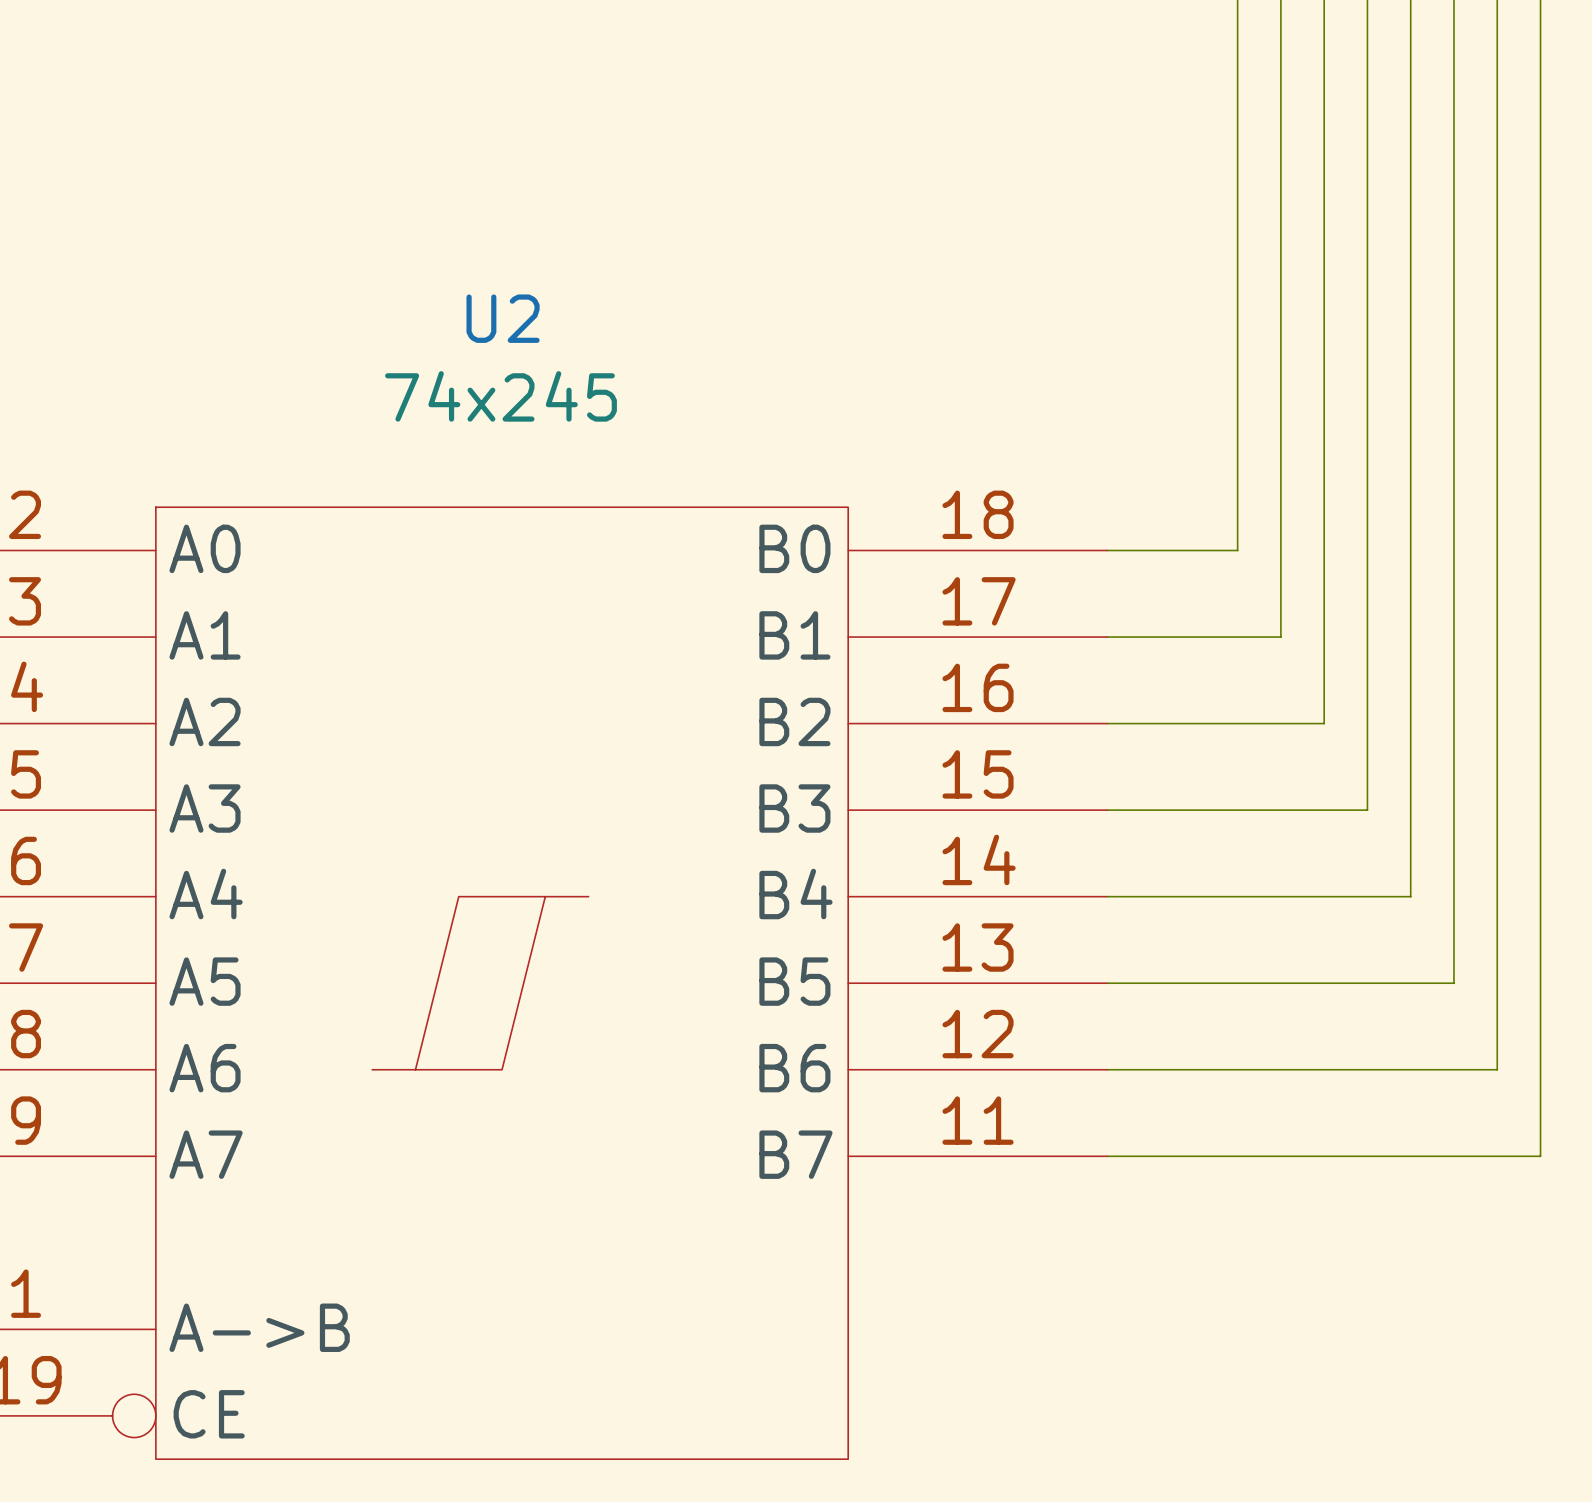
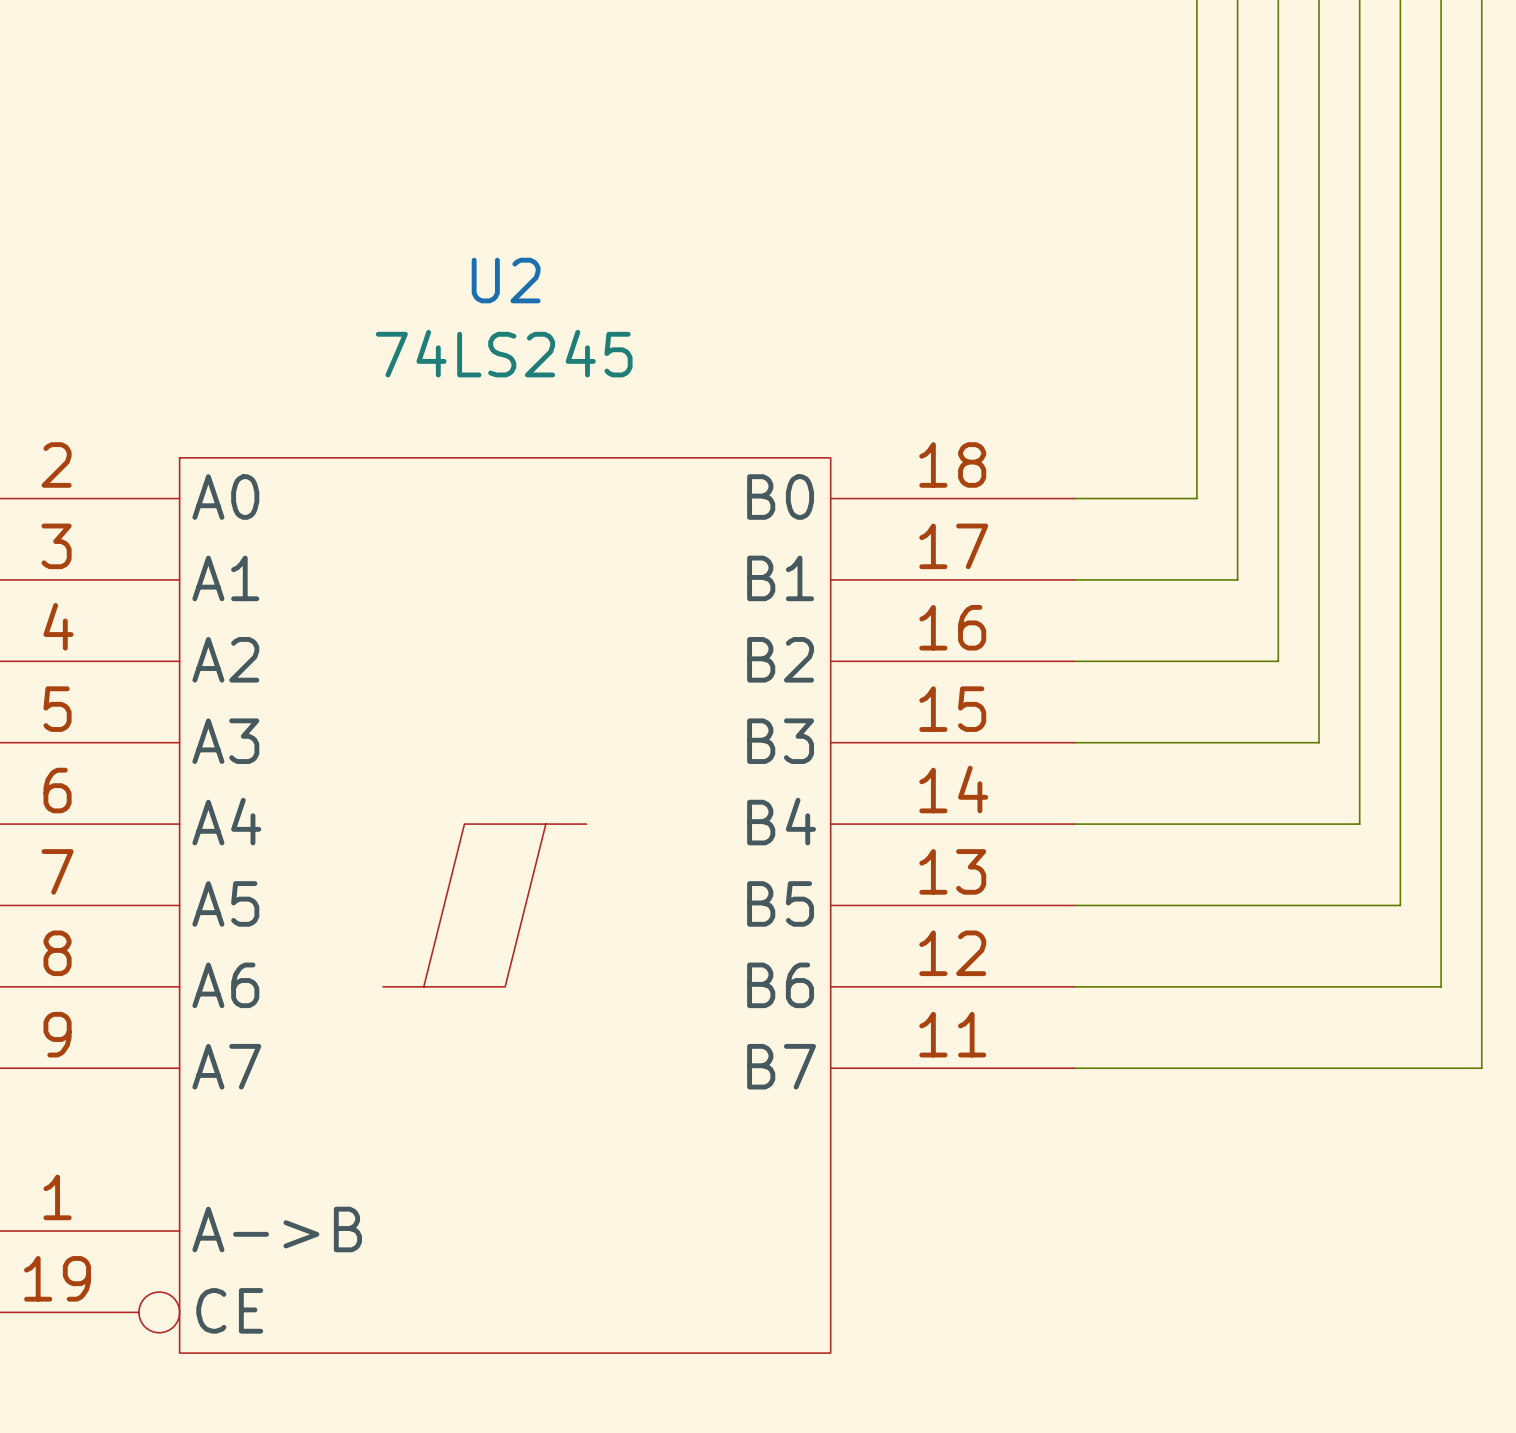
U2 value: 74x245 (501, 396) -> 74LS245 (504, 353)

